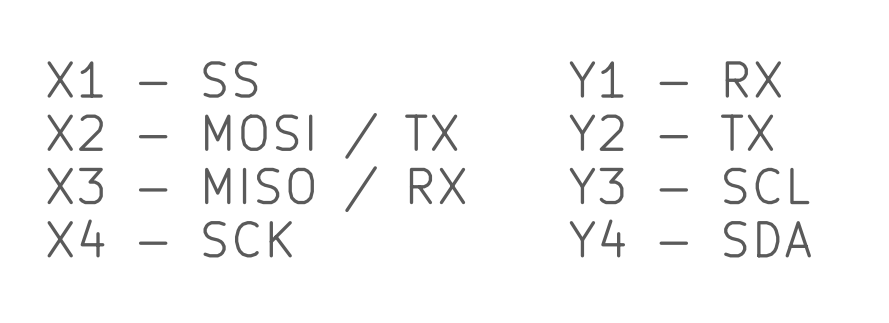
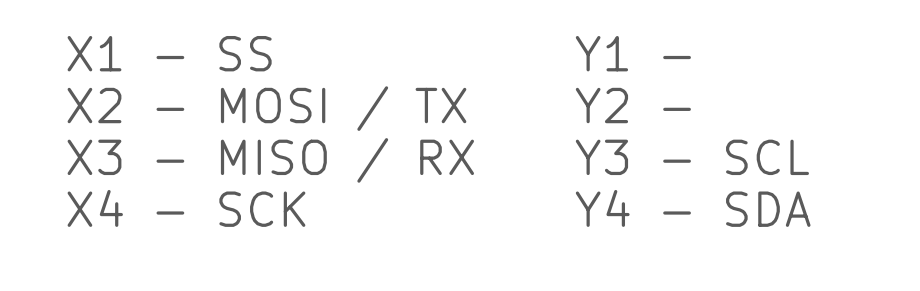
text: Y1 - RX (675, 79) -> Y1 - (633, 53)
text: Y2 - TX (671, 132) -> Y2 - (633, 105)

